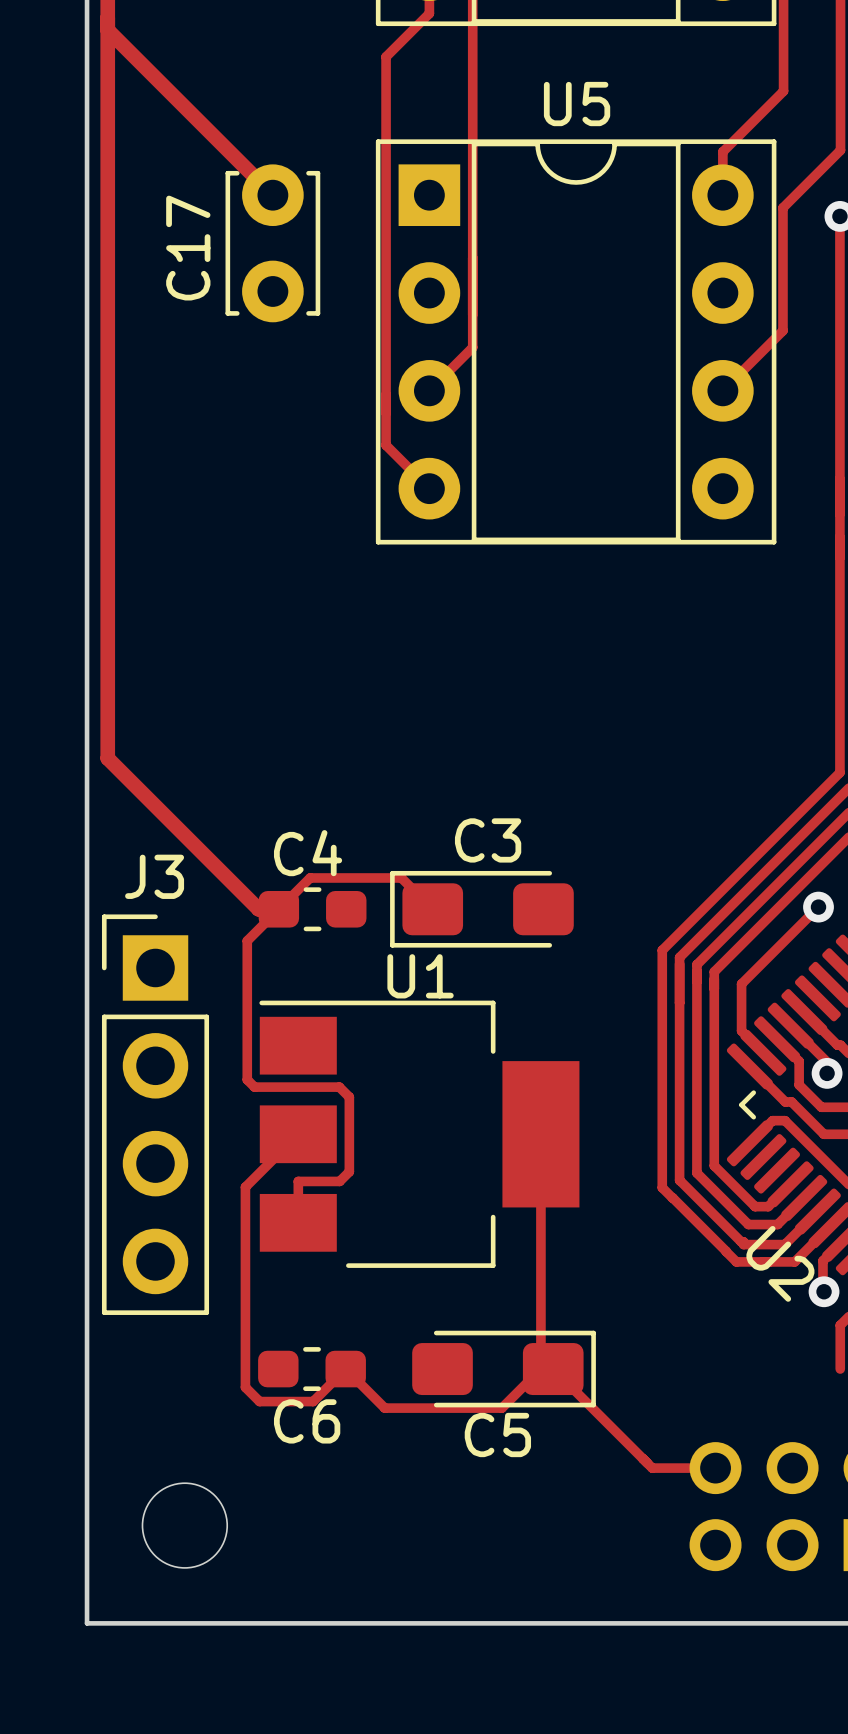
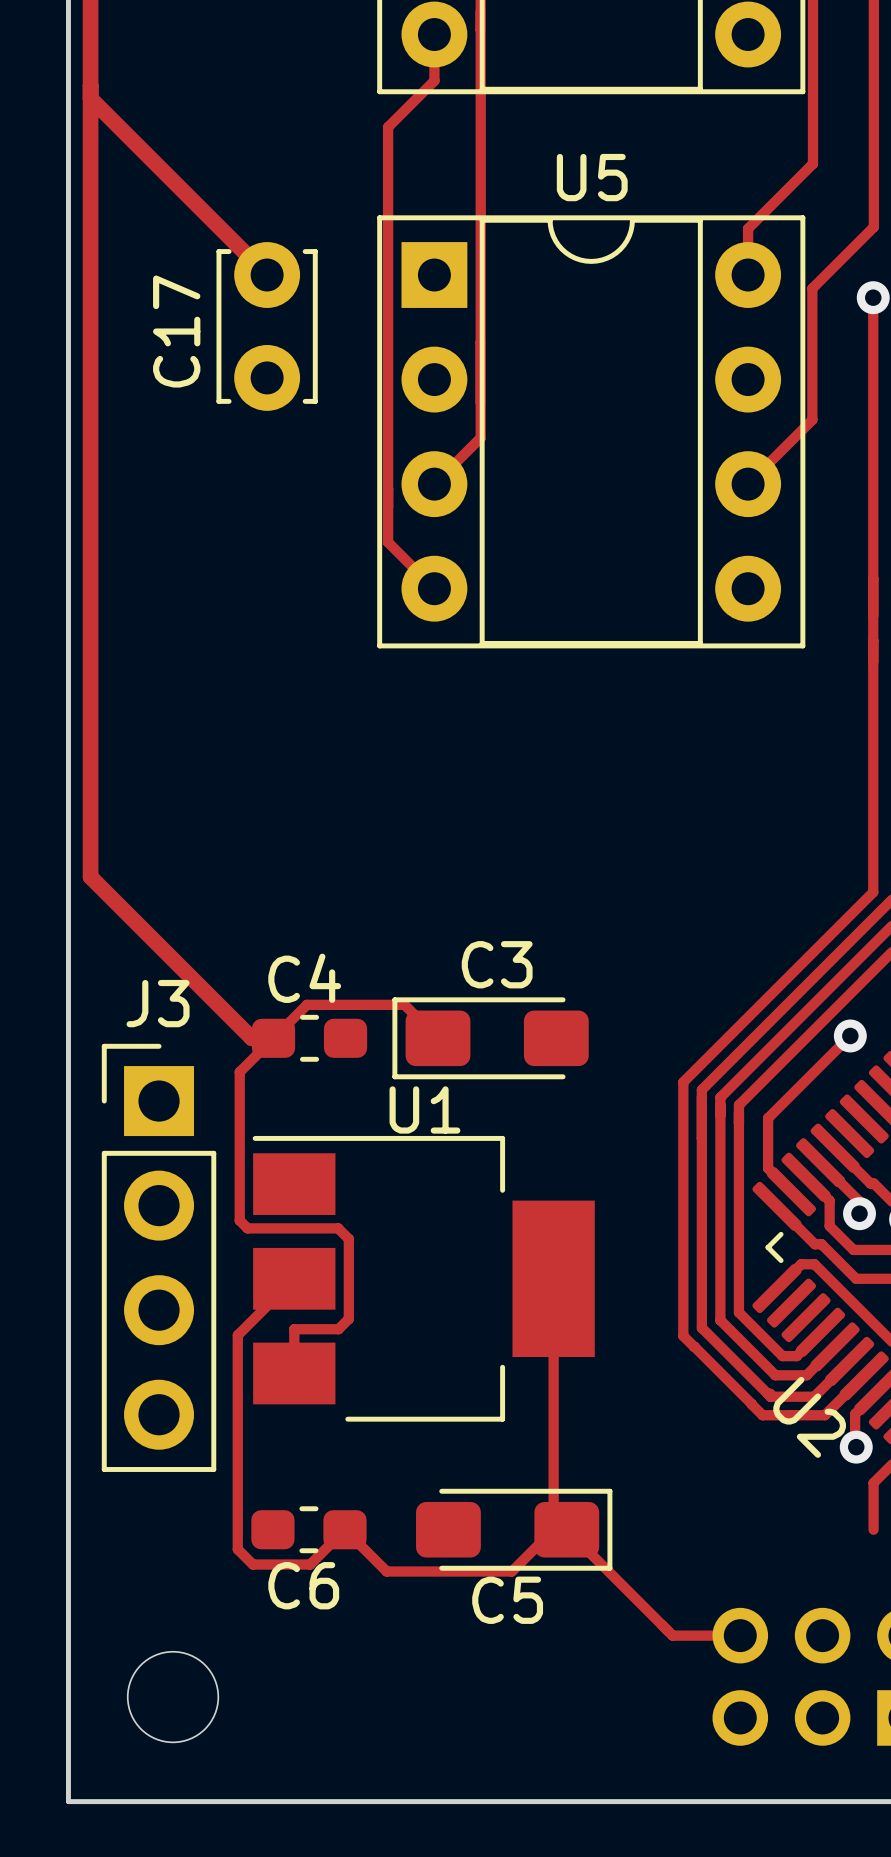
J3 position: (155, 1114) -> (159, 1257)

